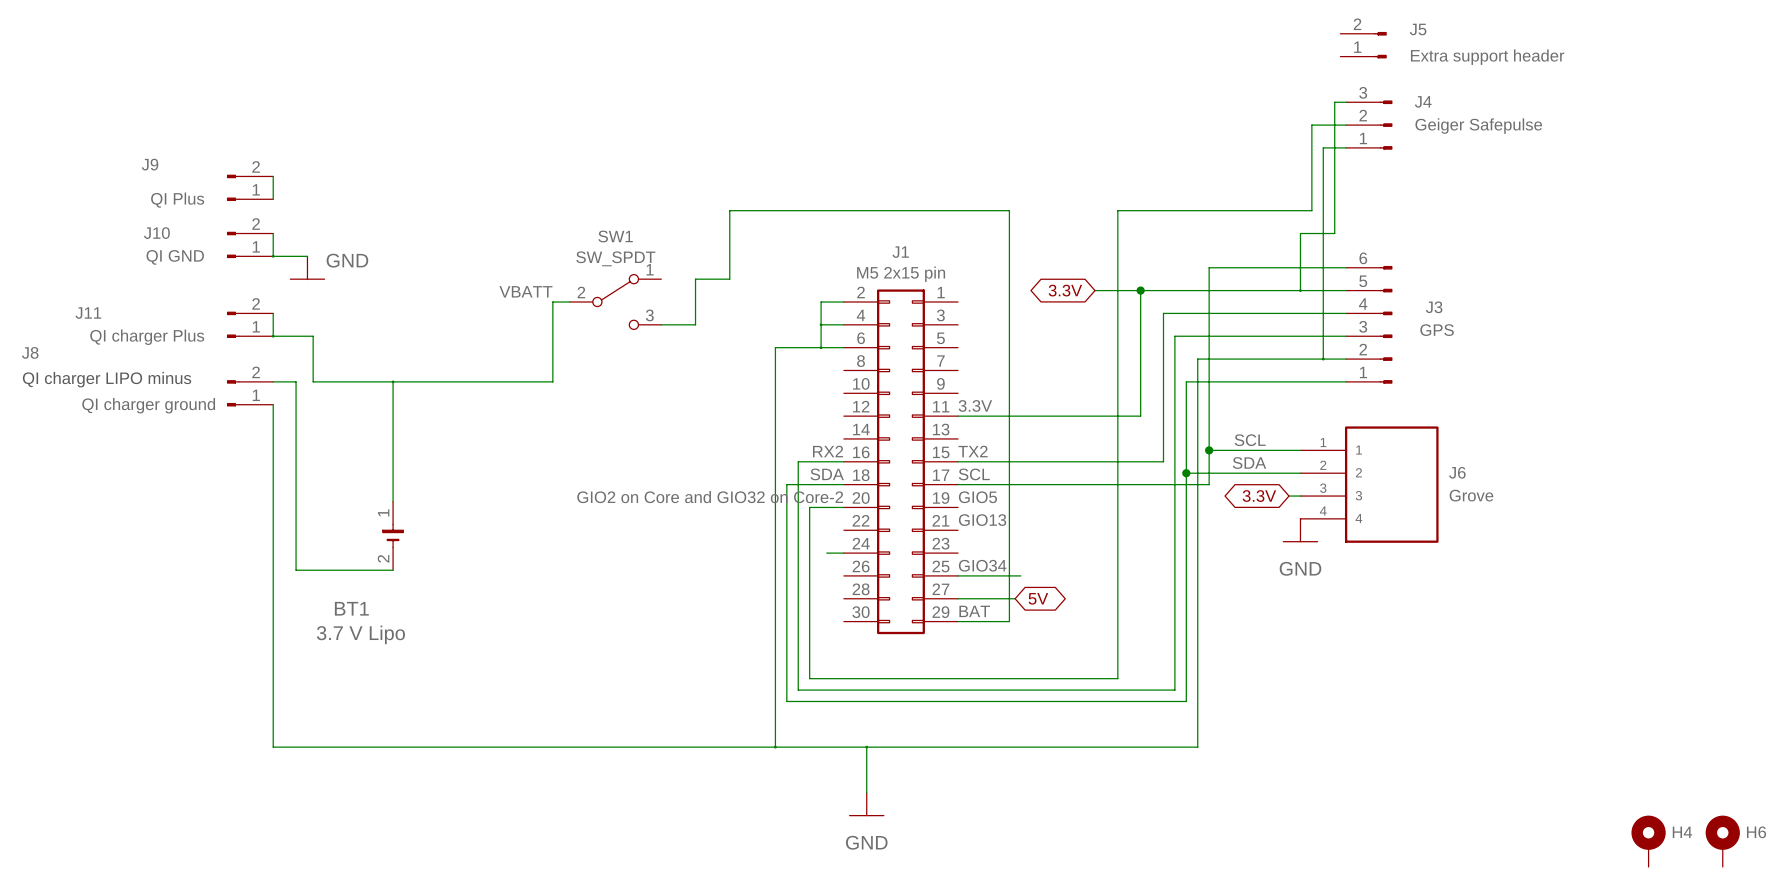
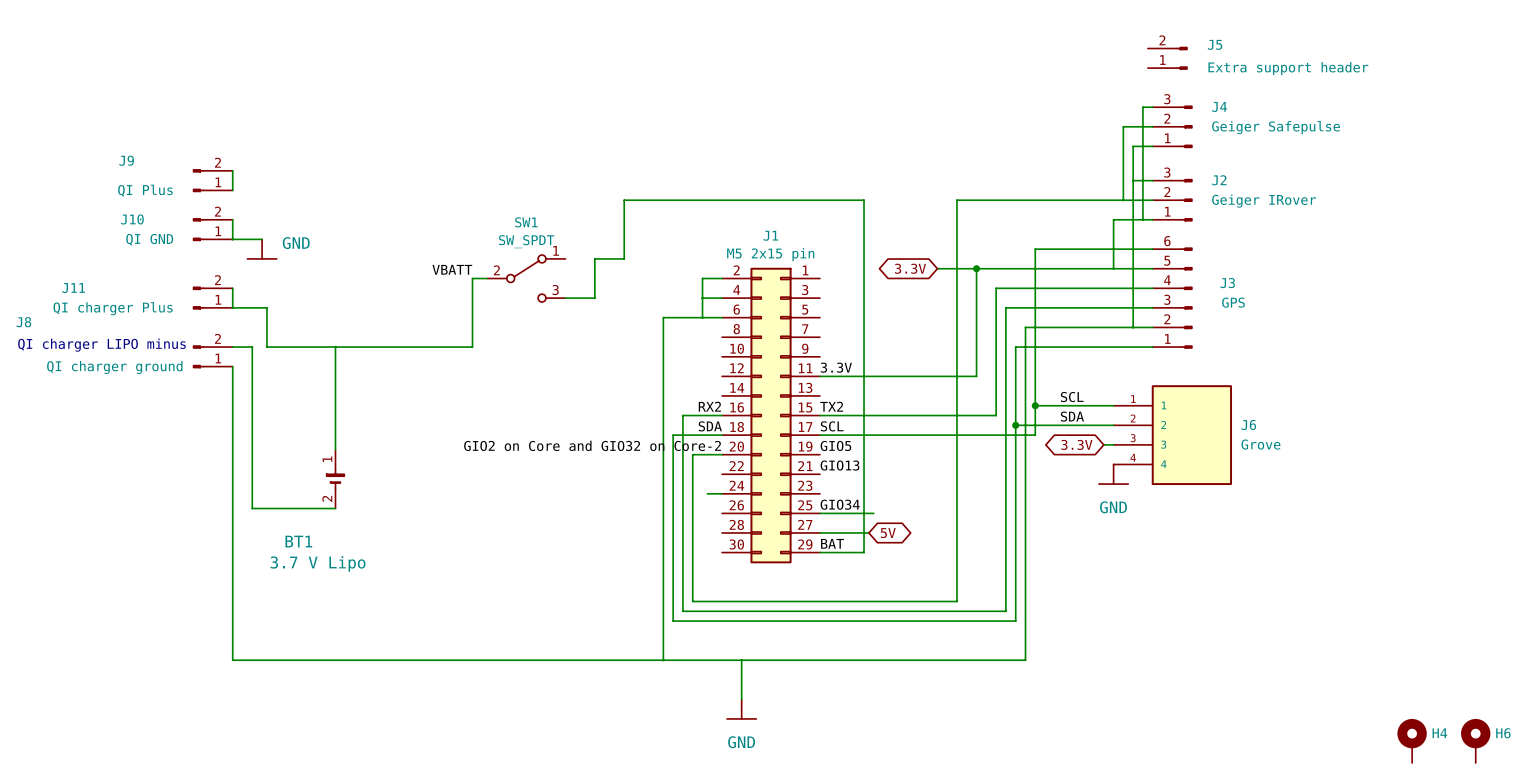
wire: none -> (1133, 180) (1152, 180)
wire: none -> (1123, 200) (1152, 200)
J2: none -> Geiger IRover (1172, 200)
wire: none -> (1142, 219) (1152, 219)

